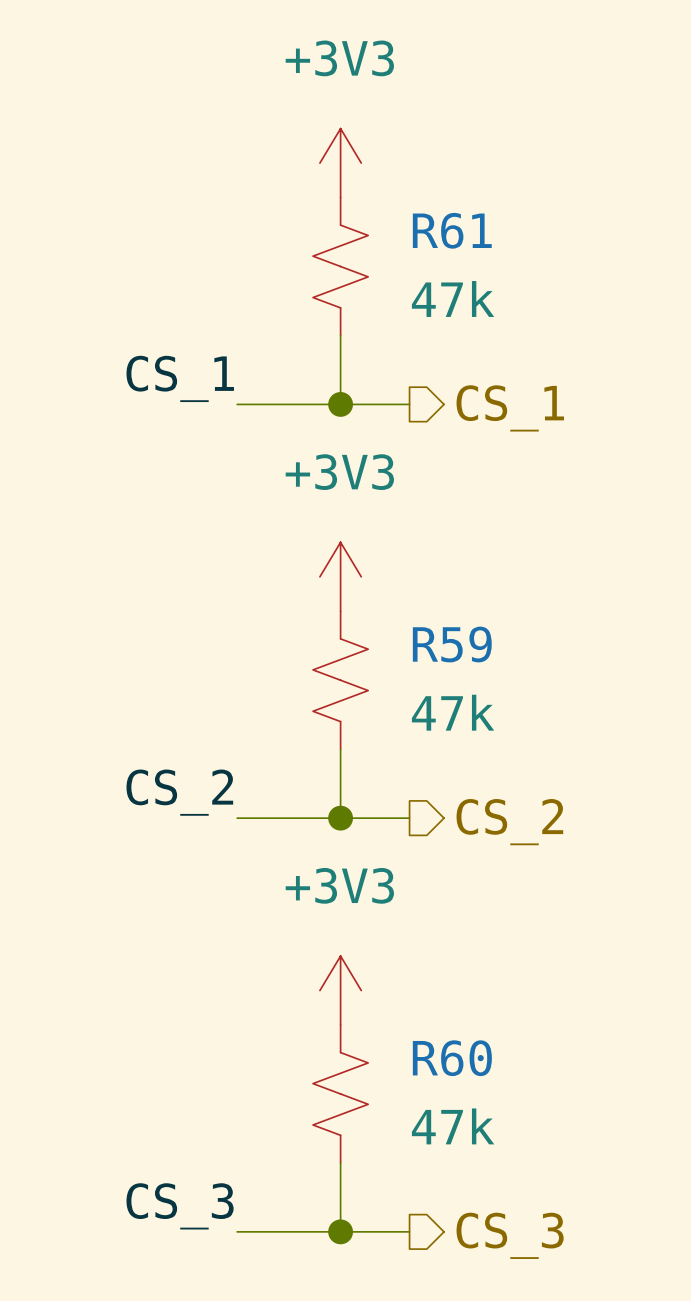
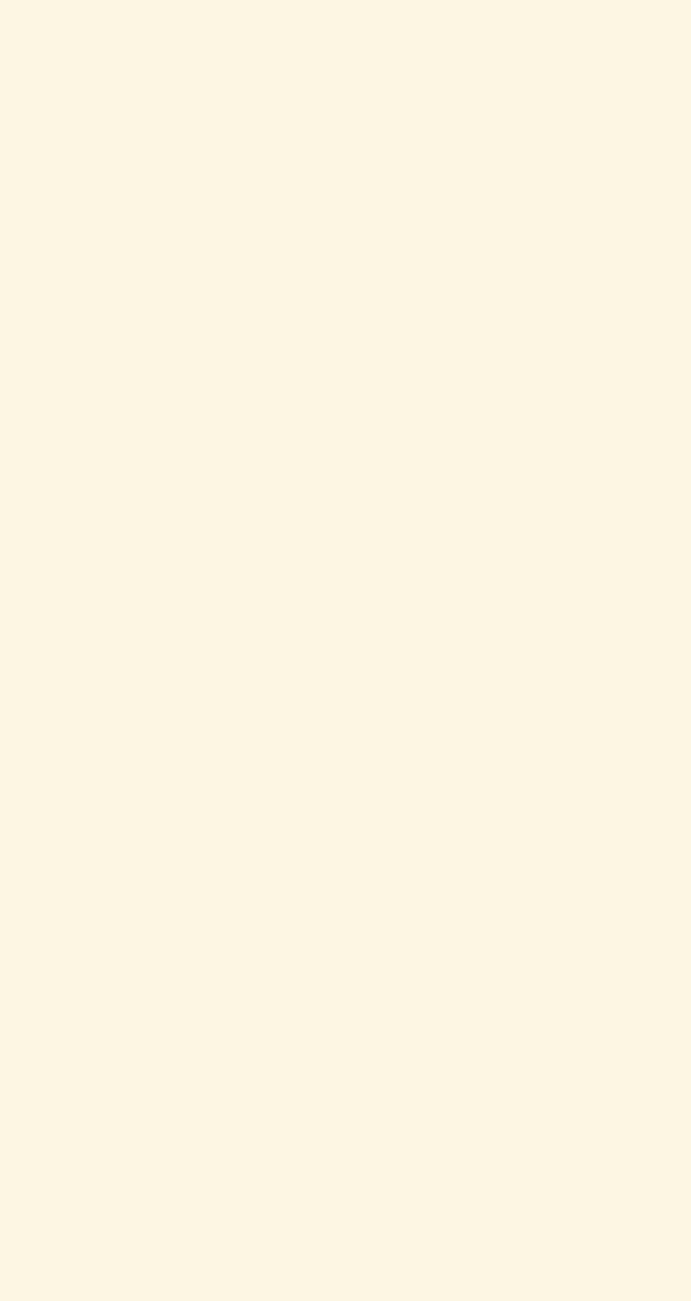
power symbol: +3V3 (340, 163) -> none
R61: 47k (340, 266) -> none
wire: (340, 335) (340, 404) -> none
label: CS_1 (180, 378) -> none
wire: (237, 404) (409, 404) -> none
junction: (340, 404) -> none
hierarchical label: CS_1 (510, 408) -> none
power symbol: +3V3 (340, 576) -> none
R59: 47k (340, 680) -> none
wire: (340, 749) (340, 818) -> none
label: CS_2 (179, 792) -> none
wire: (237, 818) (409, 818) -> none
junction: (340, 818) -> none
hierarchical label: CS_2 (509, 822) -> none
power symbol: +3V3 (340, 990) -> none
R60: 47k (340, 1093) -> none
wire: (340, 1162) (340, 1231) -> none
label: CS_3 (180, 1206) -> none
wire: (237, 1231) (409, 1231) -> none
junction: (340, 1231) -> none
hierarchical label: CS_3 (510, 1235) -> none

